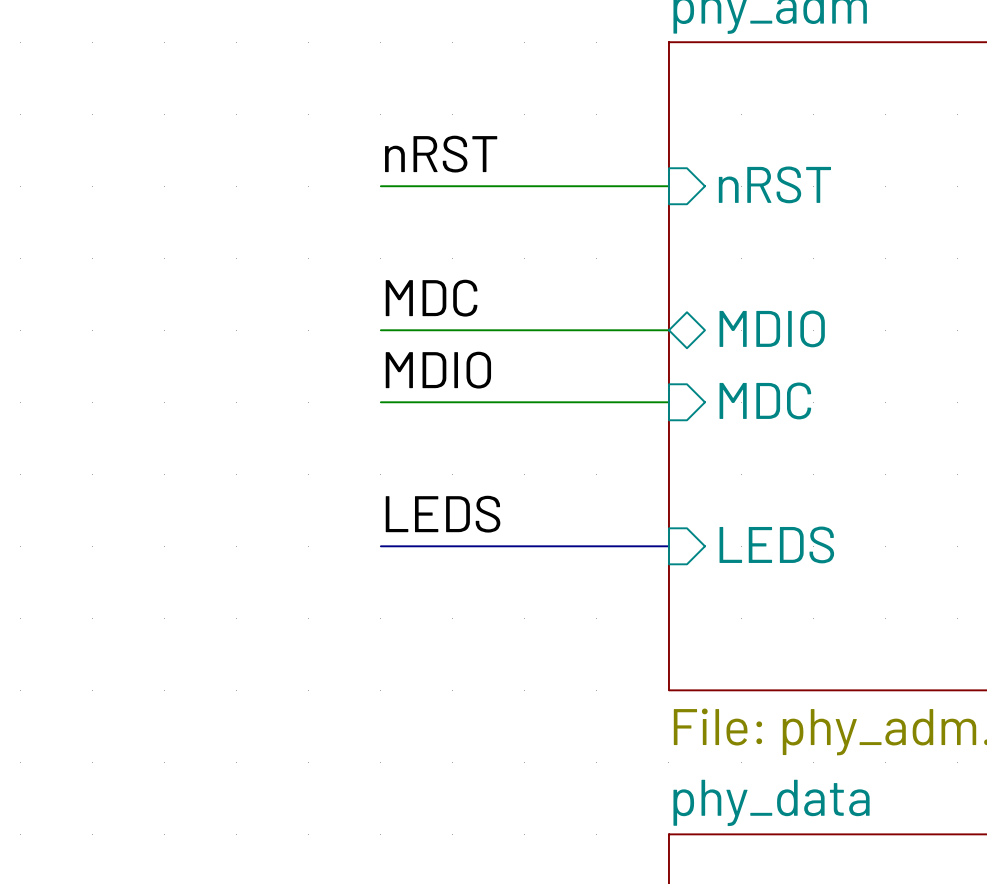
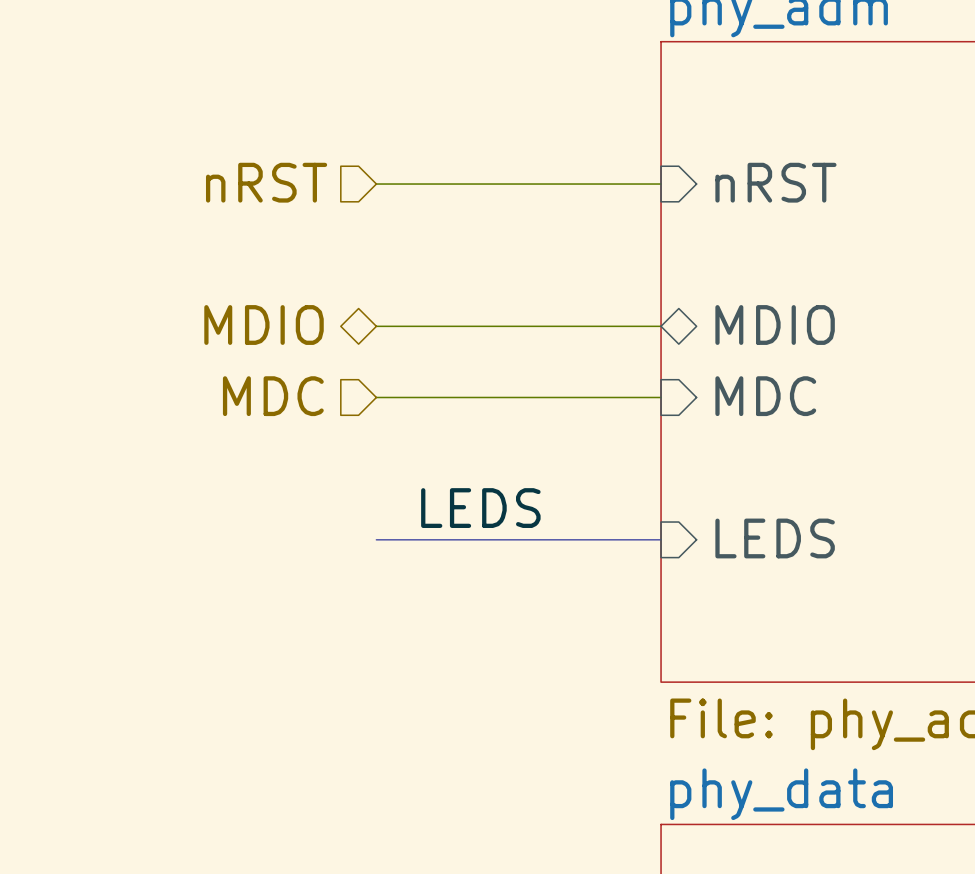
label: nRST (441, 154) -> none
hierarchical label: none -> nRST (266, 182)
label: MDC (431, 298) -> none
hierarchical label: none -> MDIO (264, 325)
label: MDIO (438, 370) -> none
hierarchical label: none -> MDC (273, 396)
label position: LEDS (443, 514) -> LEDS (480, 508)

